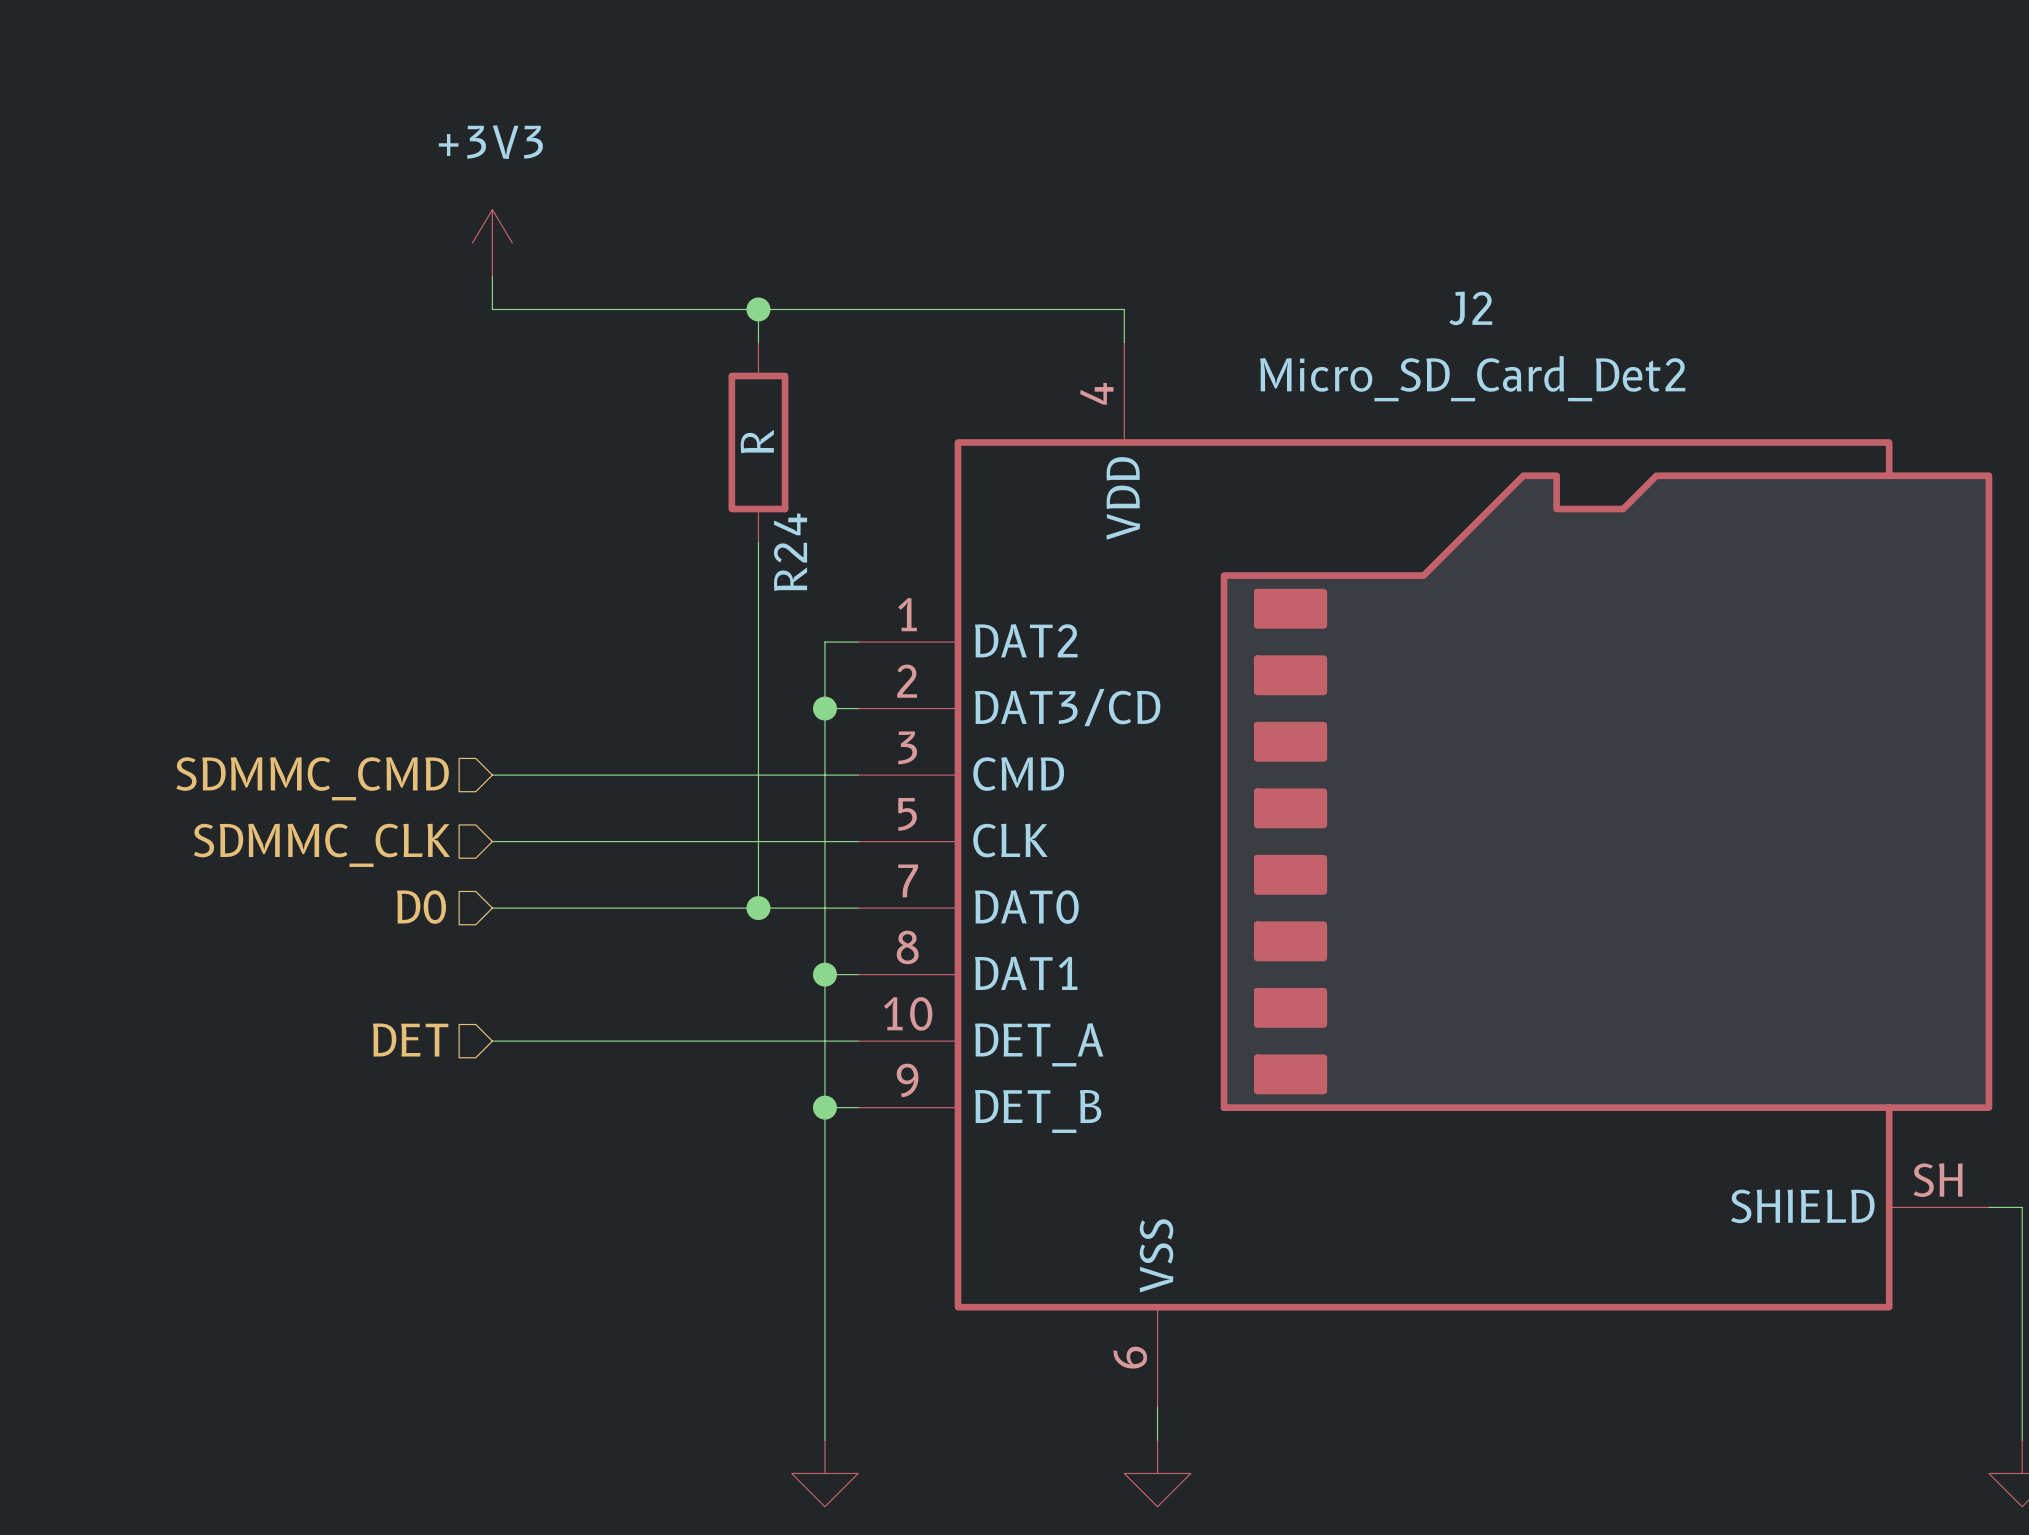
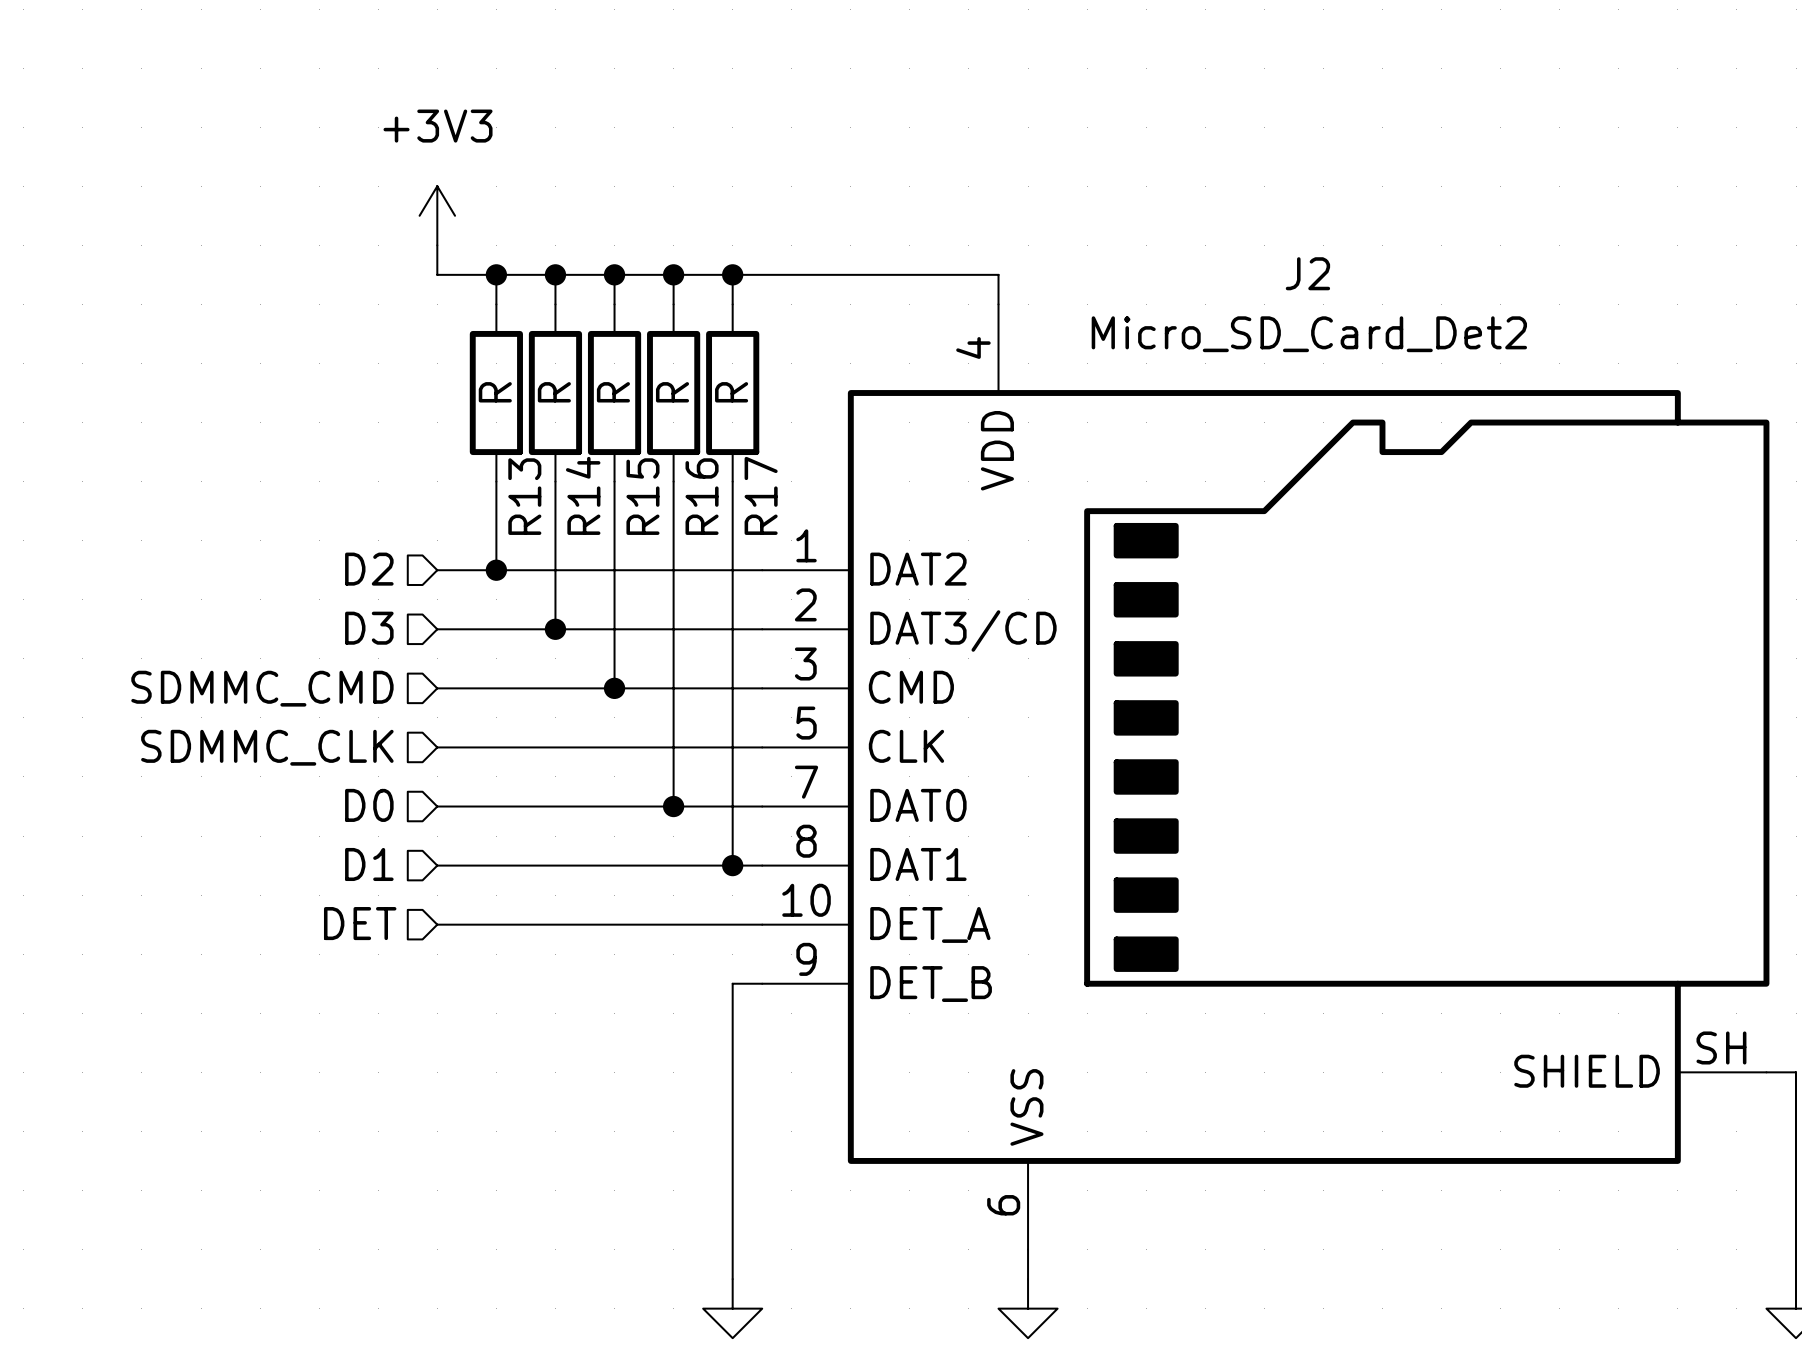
wire: none -> (496, 274) (496, 304)
junction: none -> (496, 274)
wire: none -> (555, 274) (555, 304)
junction: none -> (555, 274)
wire: none -> (614, 274) (614, 304)
junction: none -> (614, 274)
wire: none -> (732, 274) (732, 304)
junction: none -> (732, 274)
R13: none -> R (496, 393)
R14: none -> R (555, 393)
R15: none -> R (614, 393)
R17: none -> R (732, 393)
wire: none -> (496, 481) (496, 570)
wire: none -> (555, 481) (555, 629)
wire: none -> (614, 481) (614, 688)
wire: none -> (732, 481) (732, 570) (437, 570)
R24 name: R24 (790, 552) -> R16 (702, 496)
hierarchical label: none -> D2 (369, 569)
junction: none -> (496, 570)
hierarchical label: none -> D3 (369, 628)
wire: none -> (437, 629) (732, 629)
junction: none -> (555, 629)
junction: (824, 708) -> none
junction: none -> (614, 688)
hierarchical label: none -> D1 (369, 864)
wire: (824, 974) (824, 1107) -> (732, 865) (437, 865)
junction: (824, 1107) -> none

